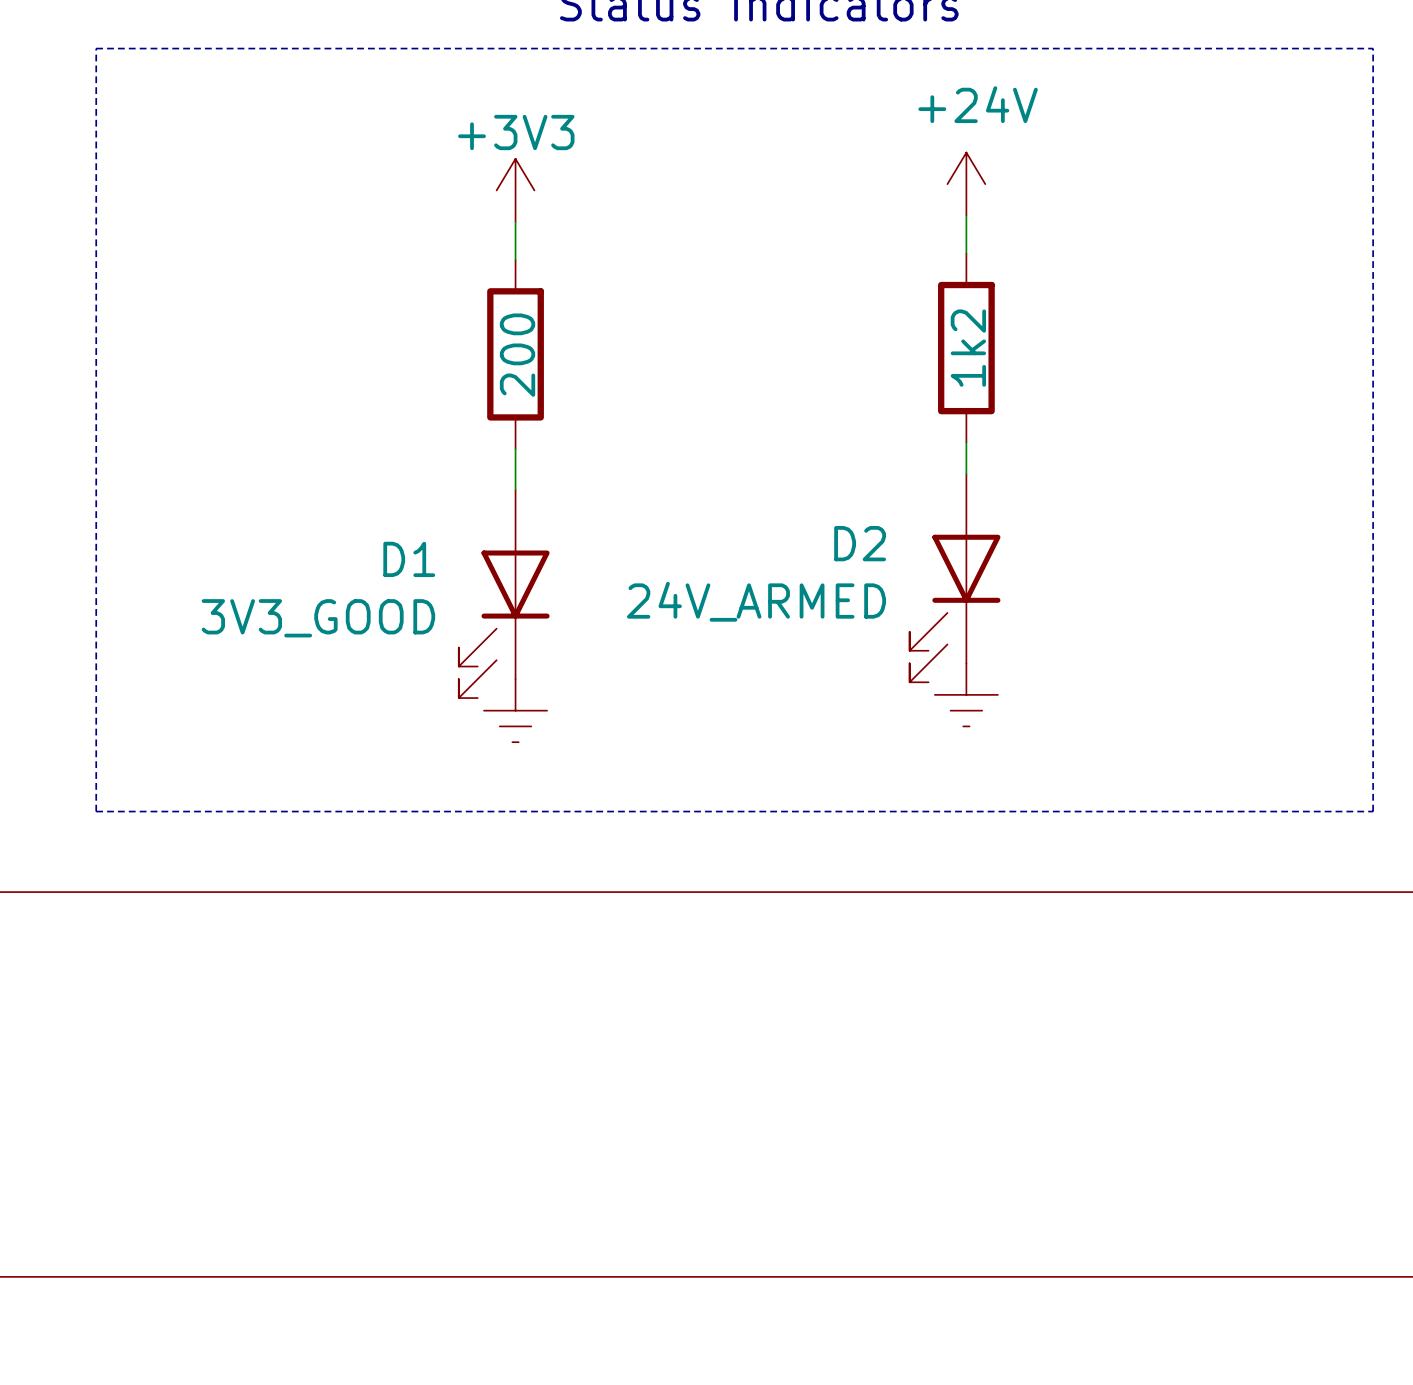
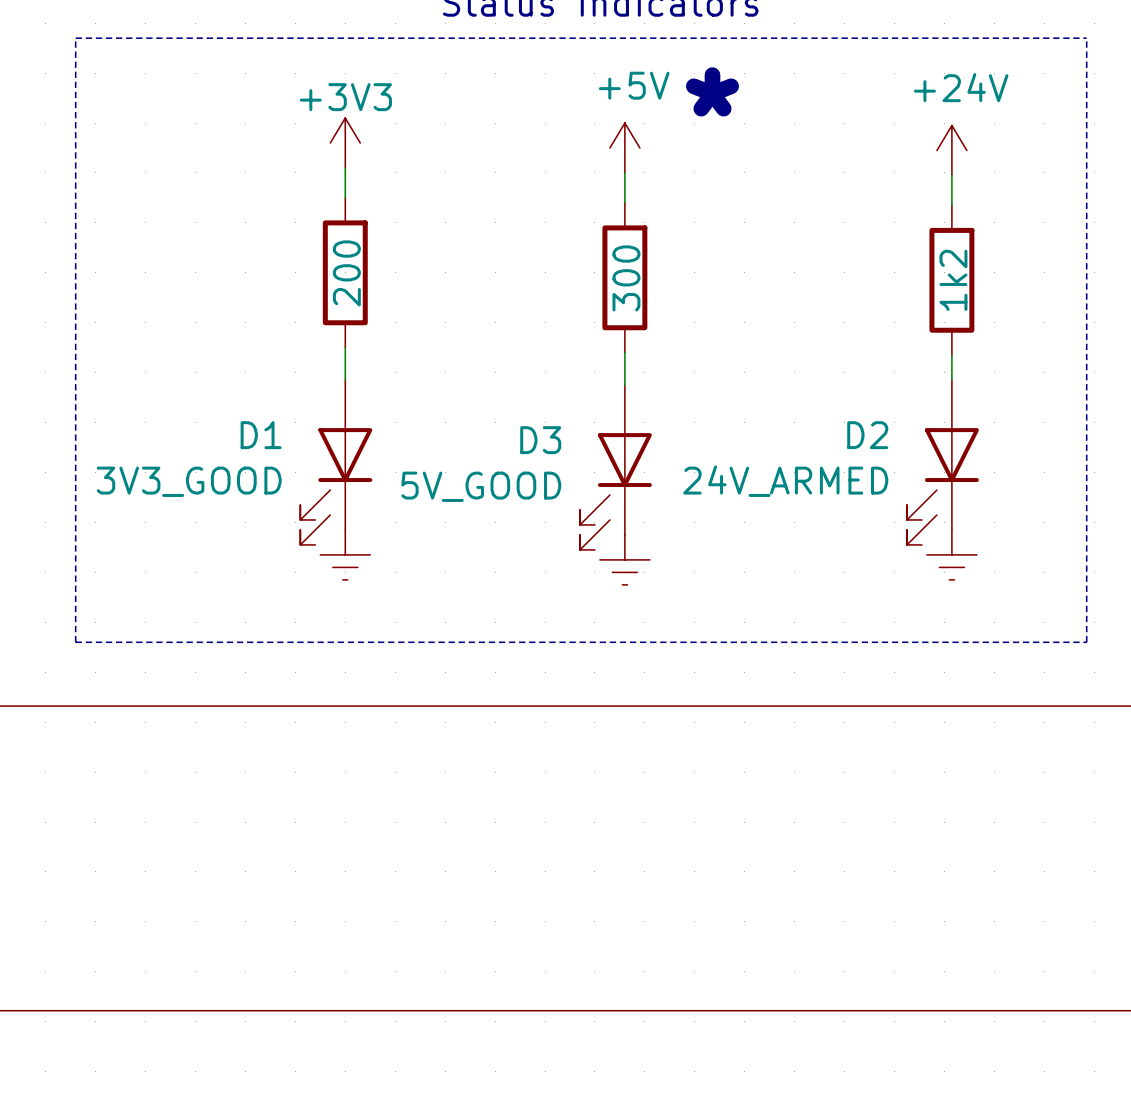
text: none -> * (712, 91)
power symbol position: +24V (966, 184) -> +24V (951, 150)
power symbol: none -> +5V (624, 148)
power symbol position: +3V3 (515, 190) -> +3V3 (345, 143)
wire: (966, 215) (966, 253) -> (951, 175) (951, 205)
wire: none -> (624, 172) (624, 202)
wire: (515, 221) (515, 259) -> (345, 167) (345, 197)
part position: (966, 348) -> (951, 280)
part: none -> 300 (624, 277)
part position: (515, 354) -> (345, 272)
wire: (966, 442) (966, 474) -> (951, 355) (951, 380)
wire: none -> (624, 352) (624, 385)
wire: (515, 448) (515, 489) -> (345, 347) (345, 380)
D2 position: (955, 578) -> (942, 462)
D3: none -> 5V_GOOD (615, 467)
D1 position: (504, 594) -> (336, 462)
power symbol: (966, 694) -> none
power symbol: none -> (951, 554)
power symbol: none -> (624, 559)
power symbol position: (515, 710) -> (345, 554)

